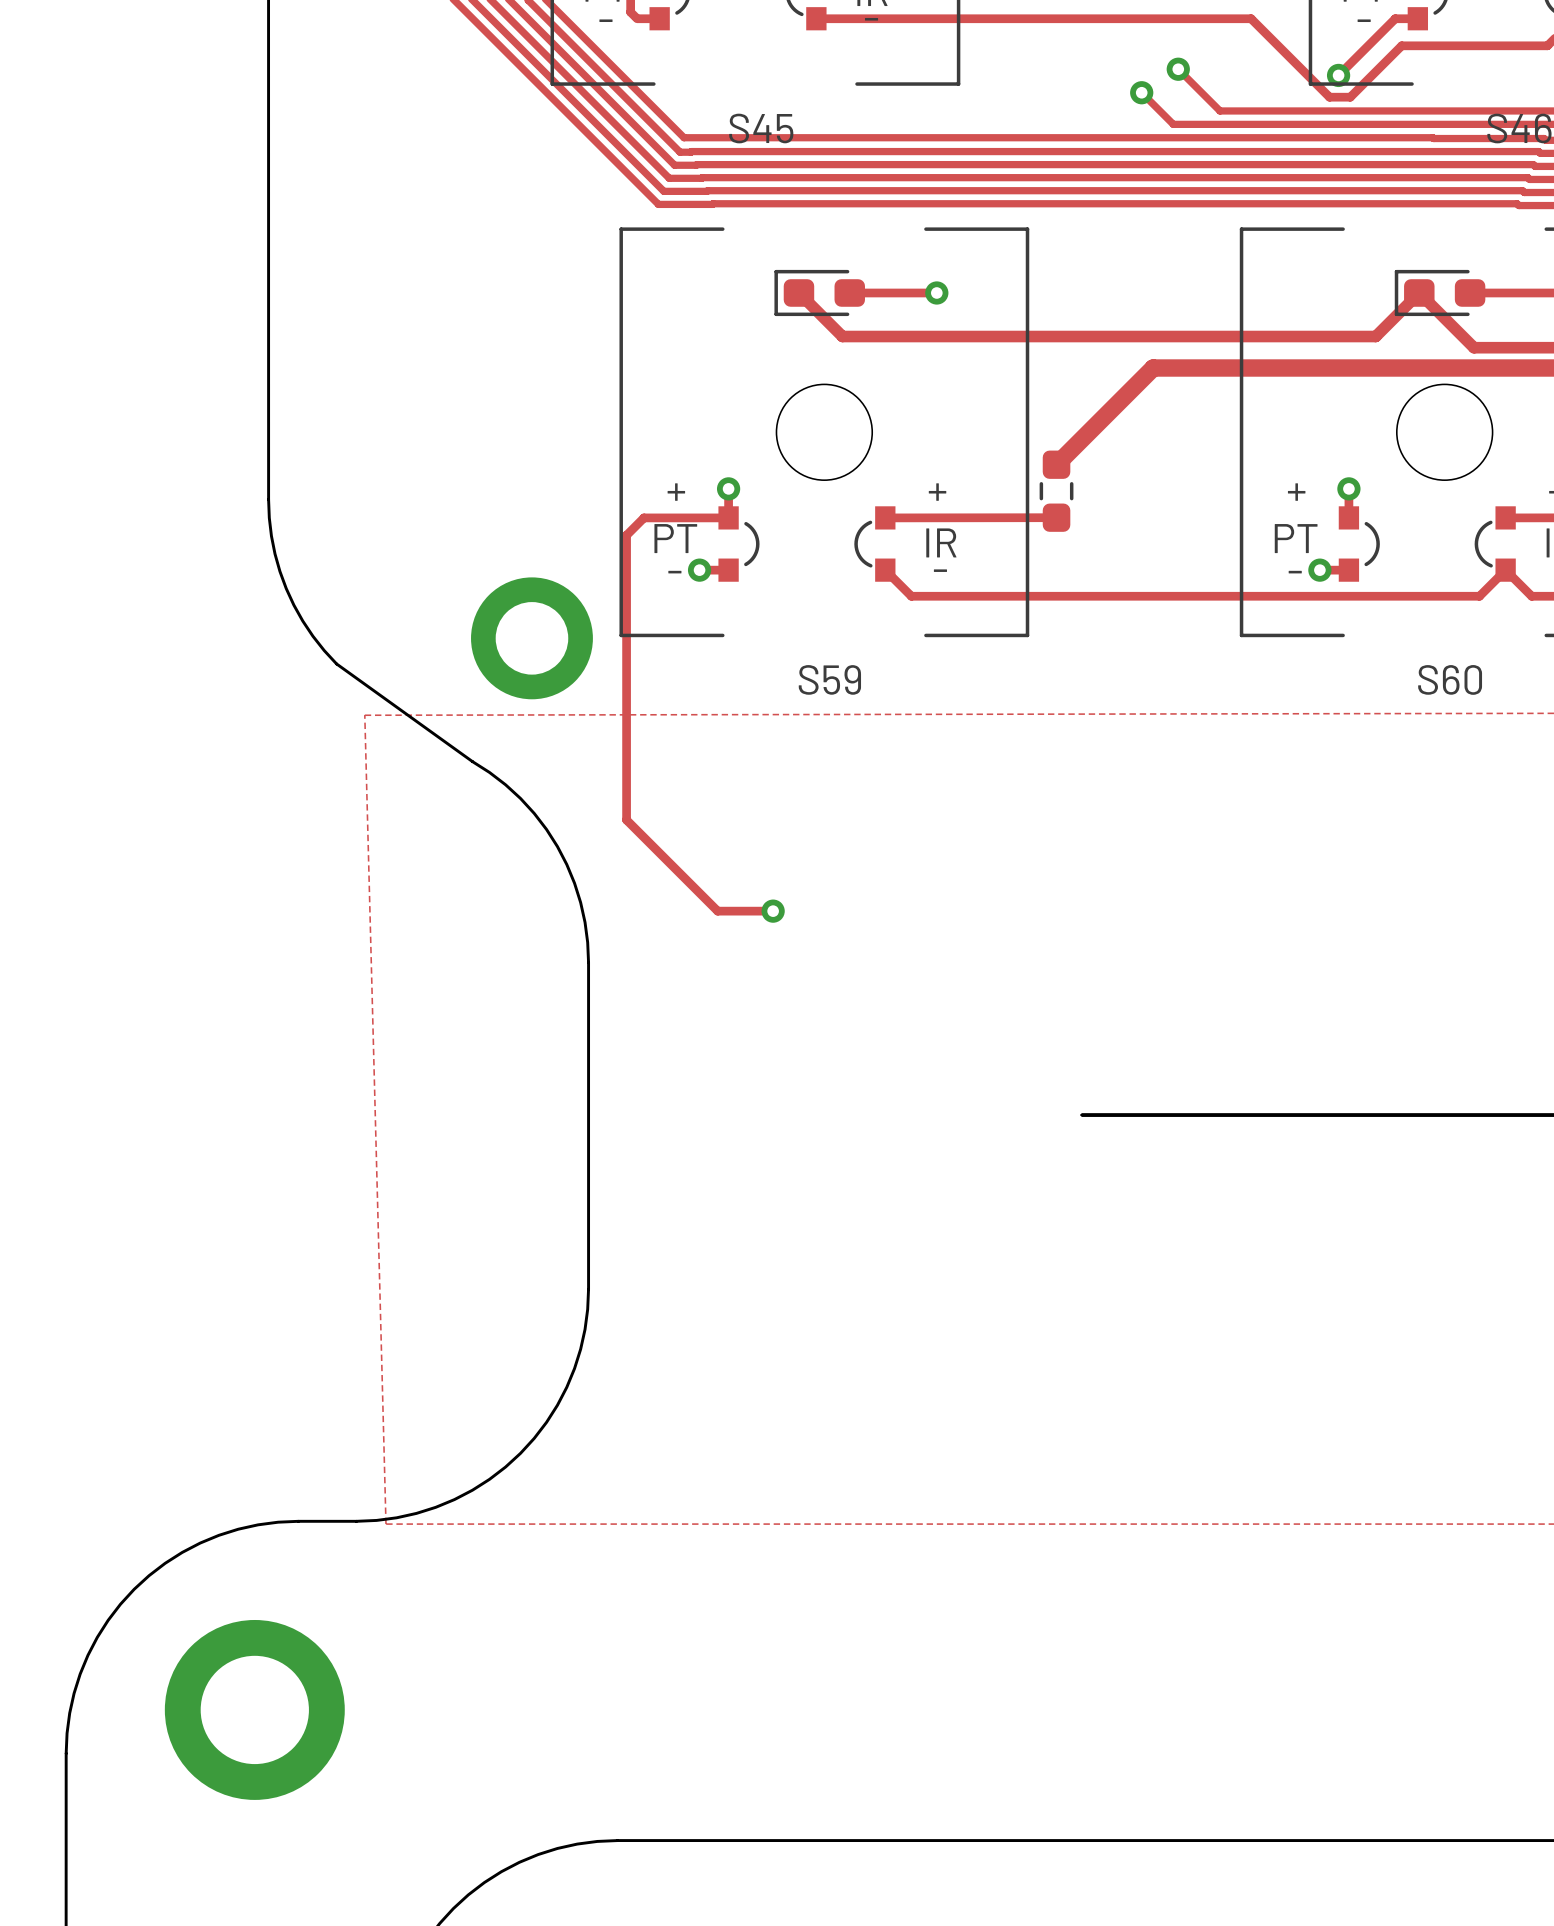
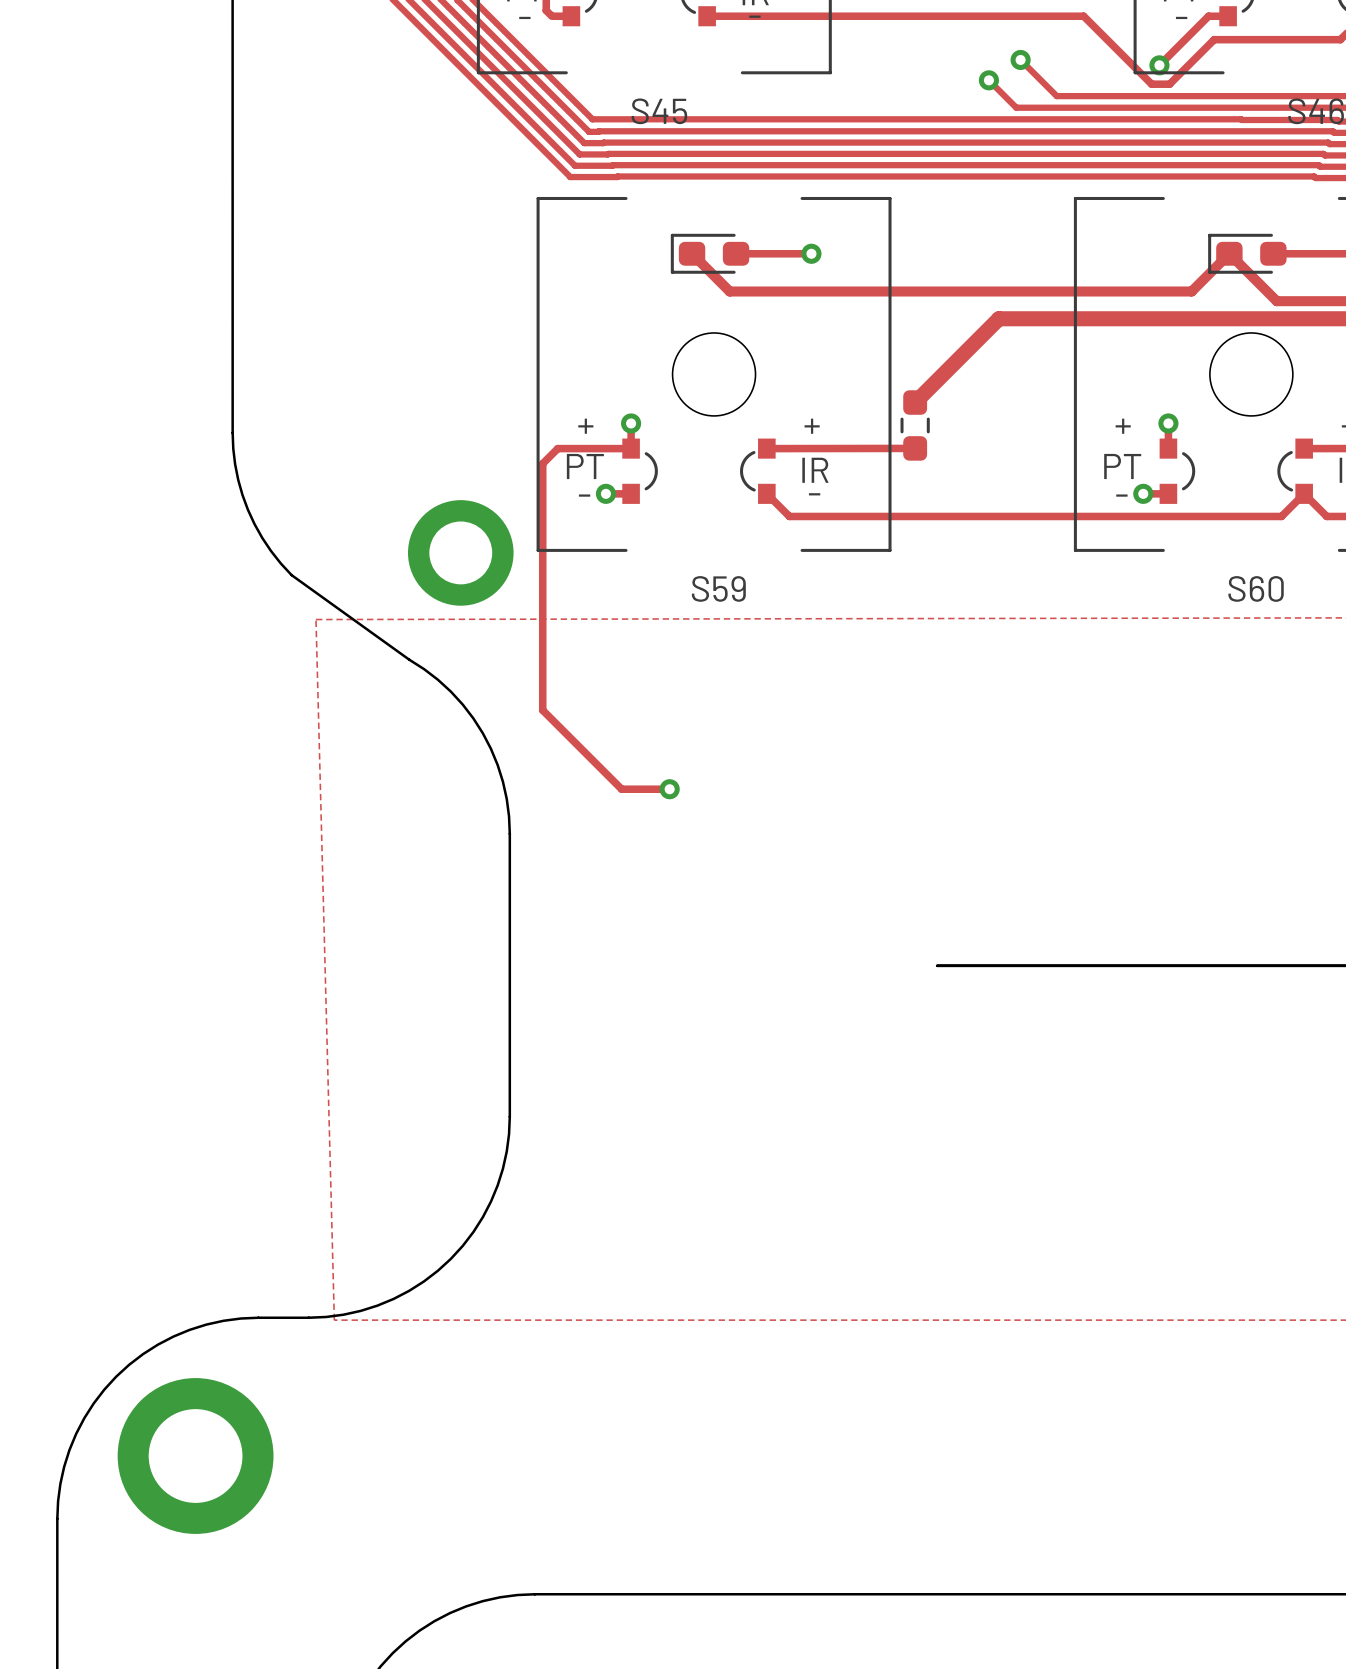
part position: (254, 1709) -> (195, 1456)

